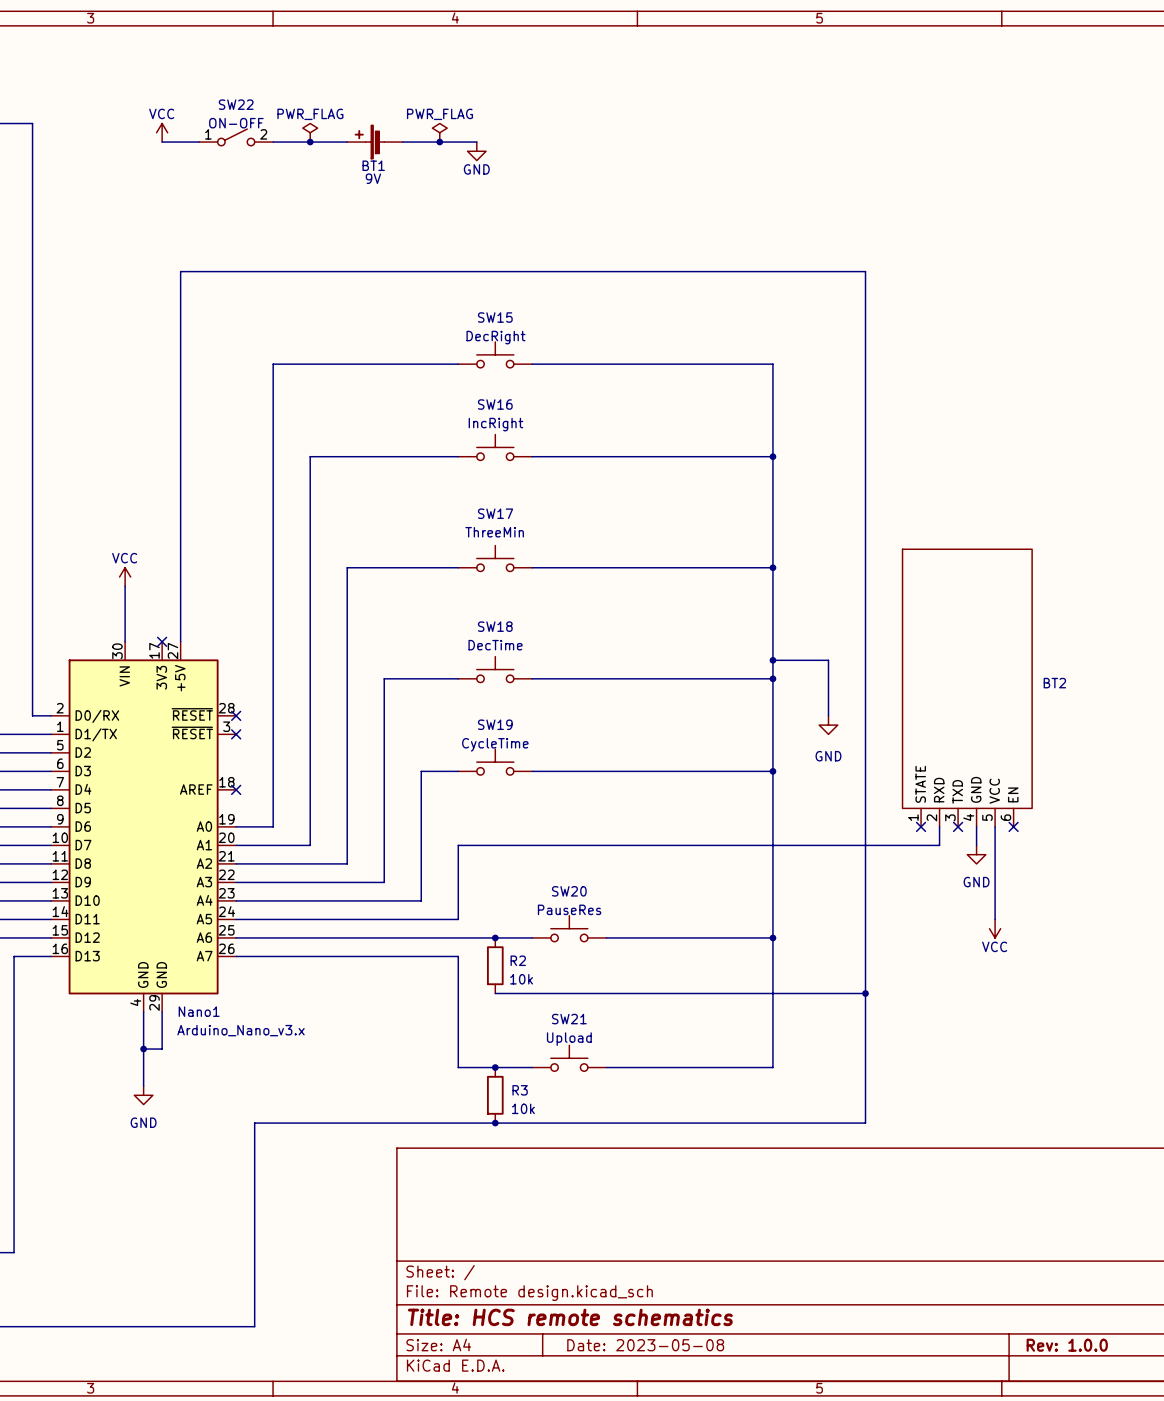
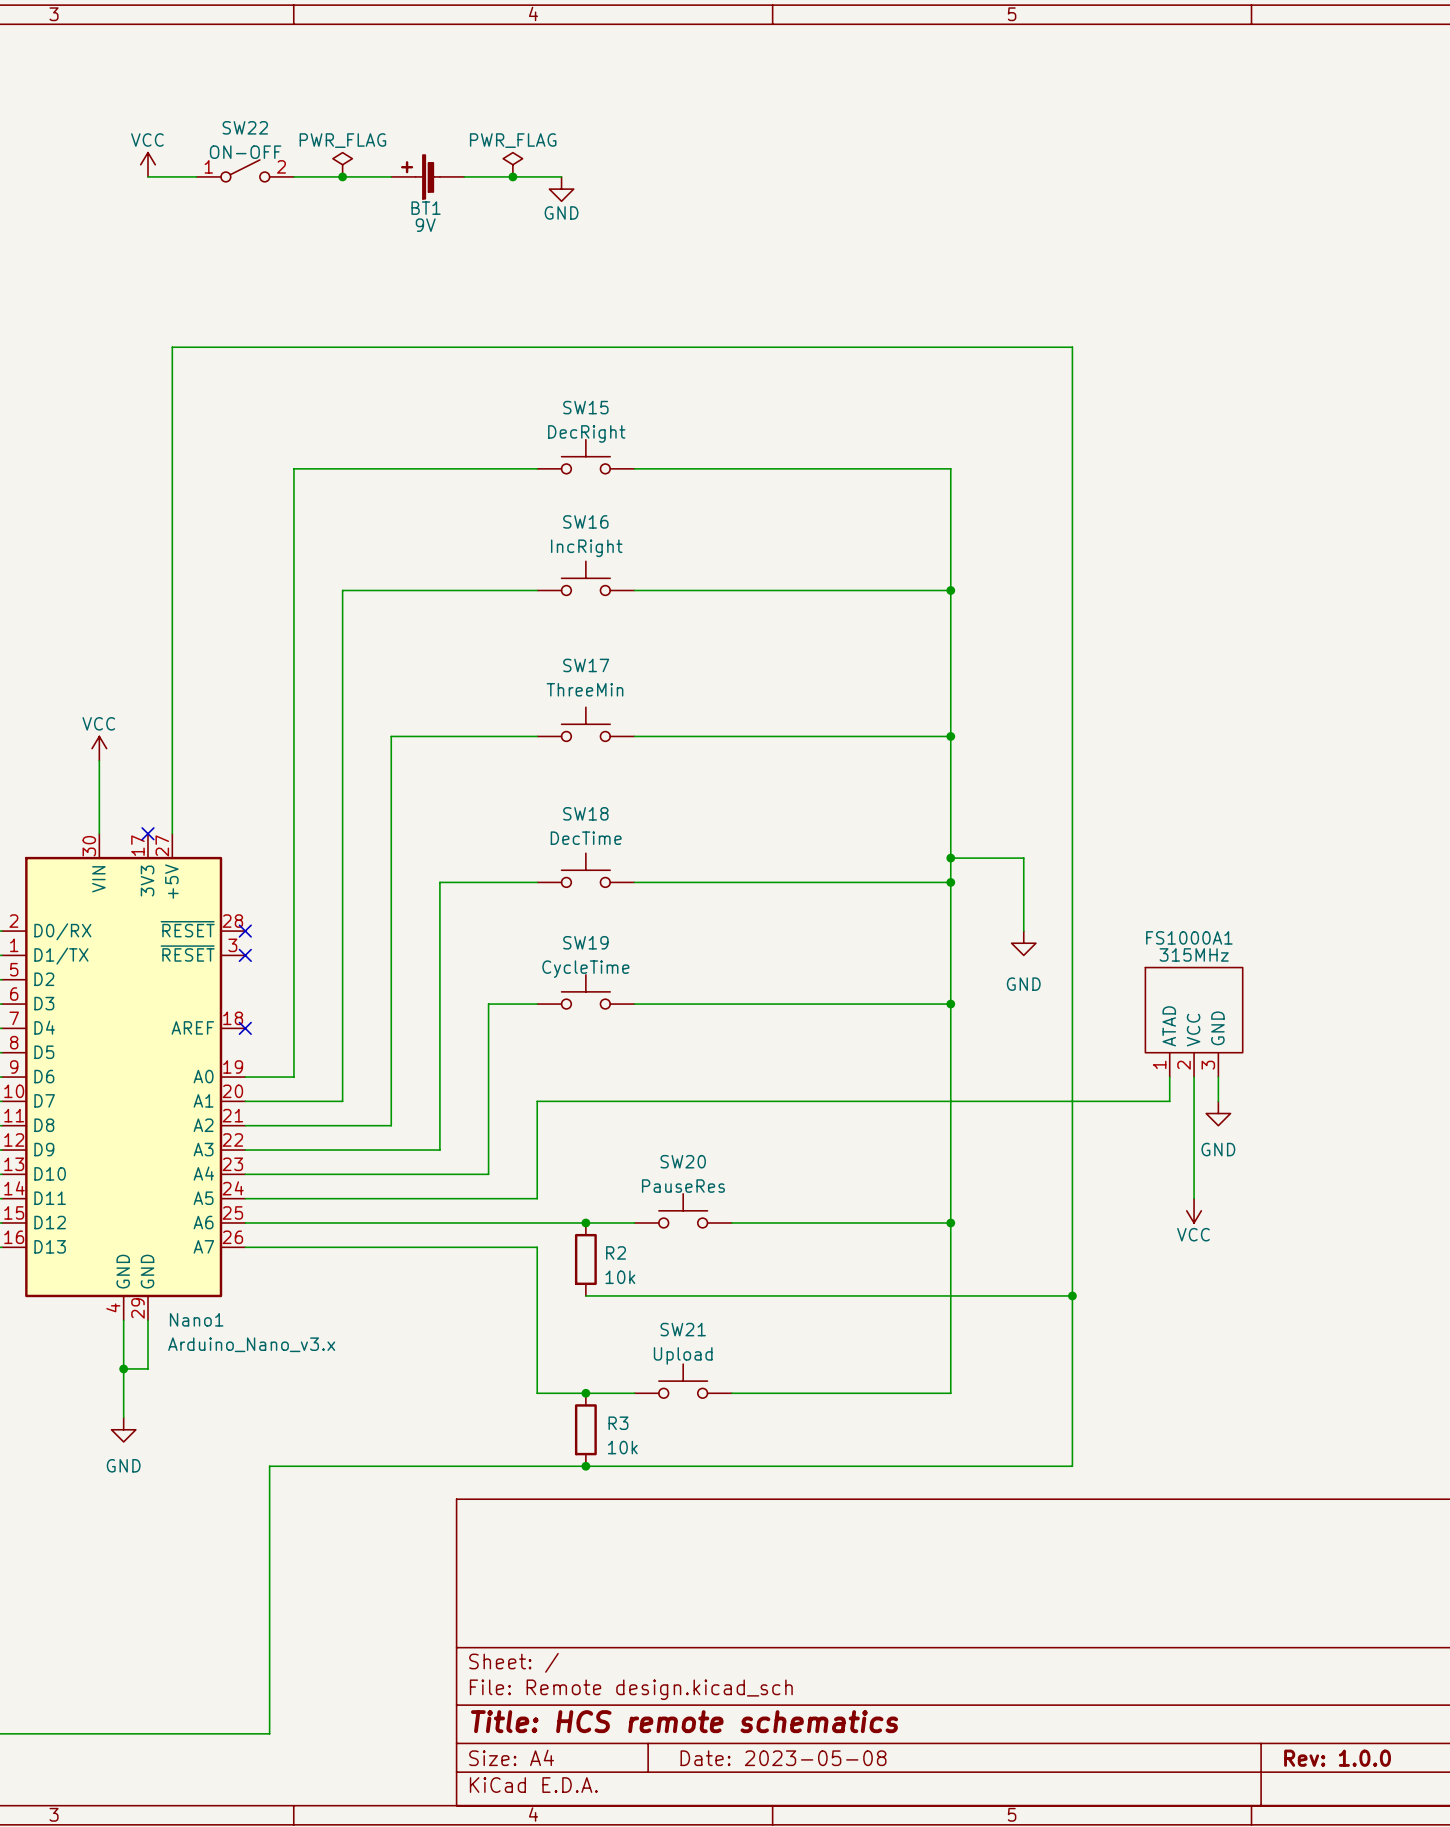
BT2: (967, 688) -> none
FS1000A1: none -> 315MHz (1194, 1022)
no-connect mark: (921, 826) -> none
no-connect mark: (958, 826) -> none
wire: (995, 826) (995, 919) -> (1194, 1077) (1194, 1198)
no-connect mark: (1013, 826) -> none
power symbol position: VCC (995, 928) -> VCC (1194, 1210)

